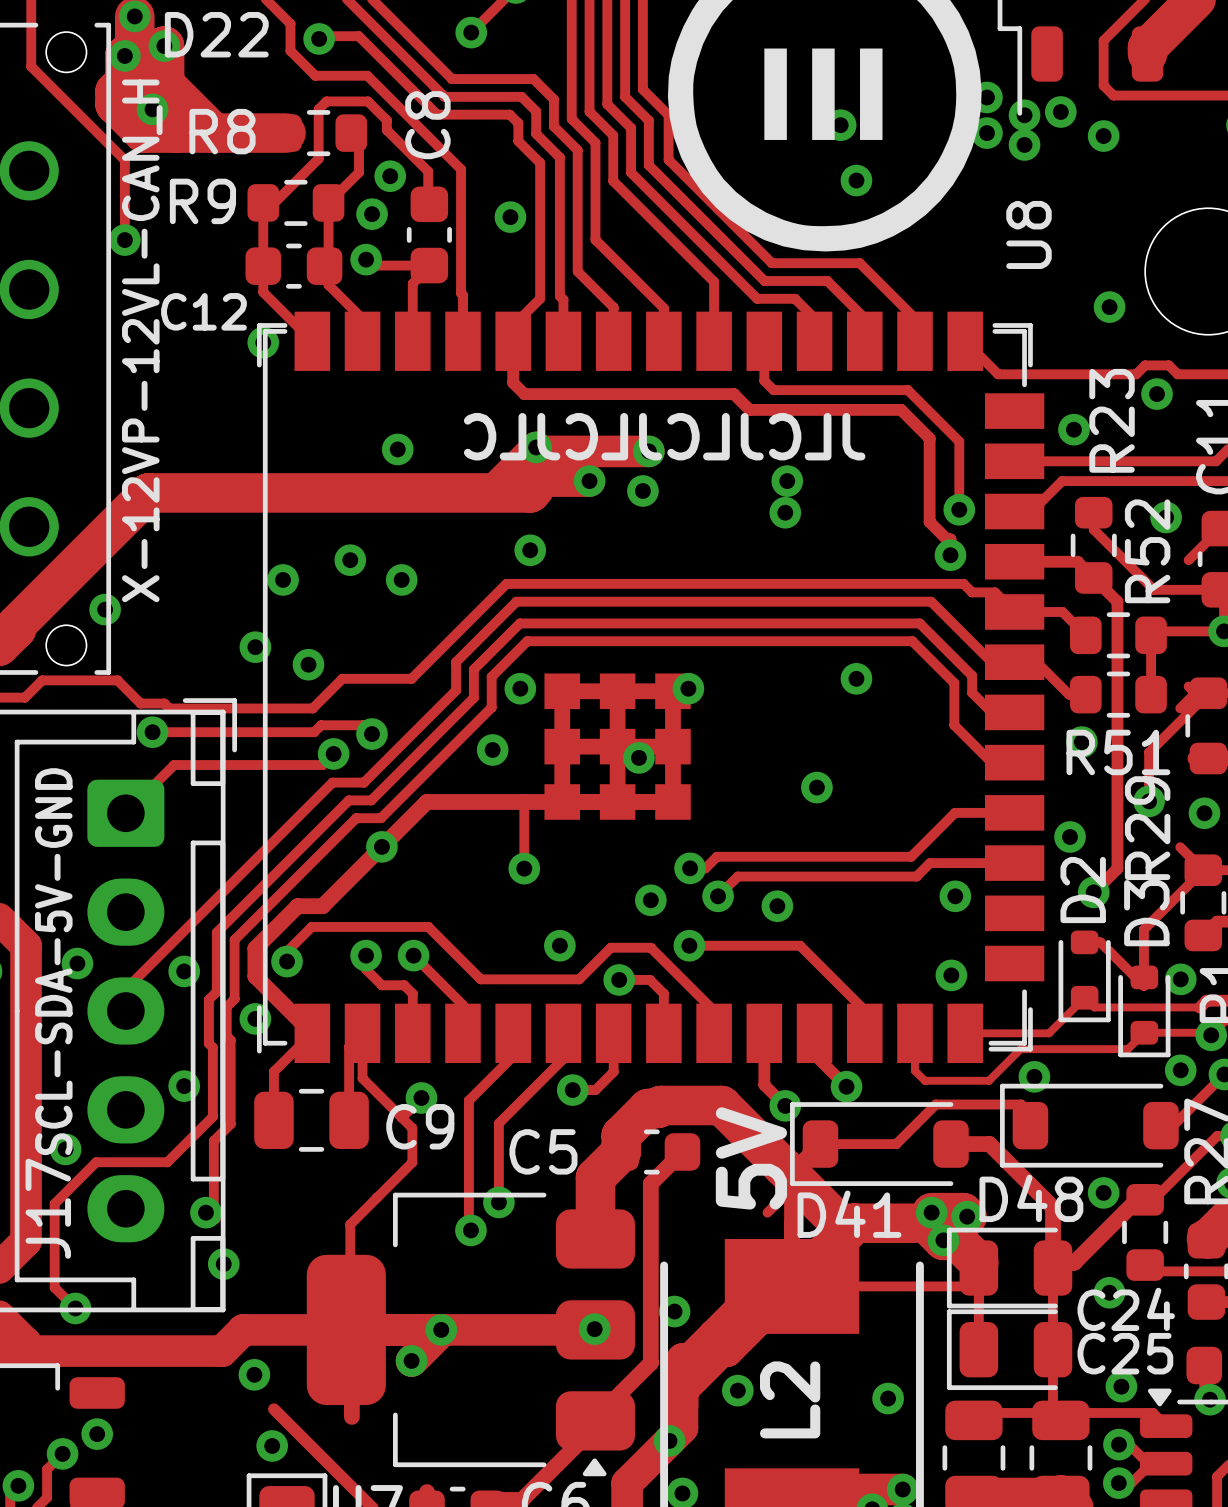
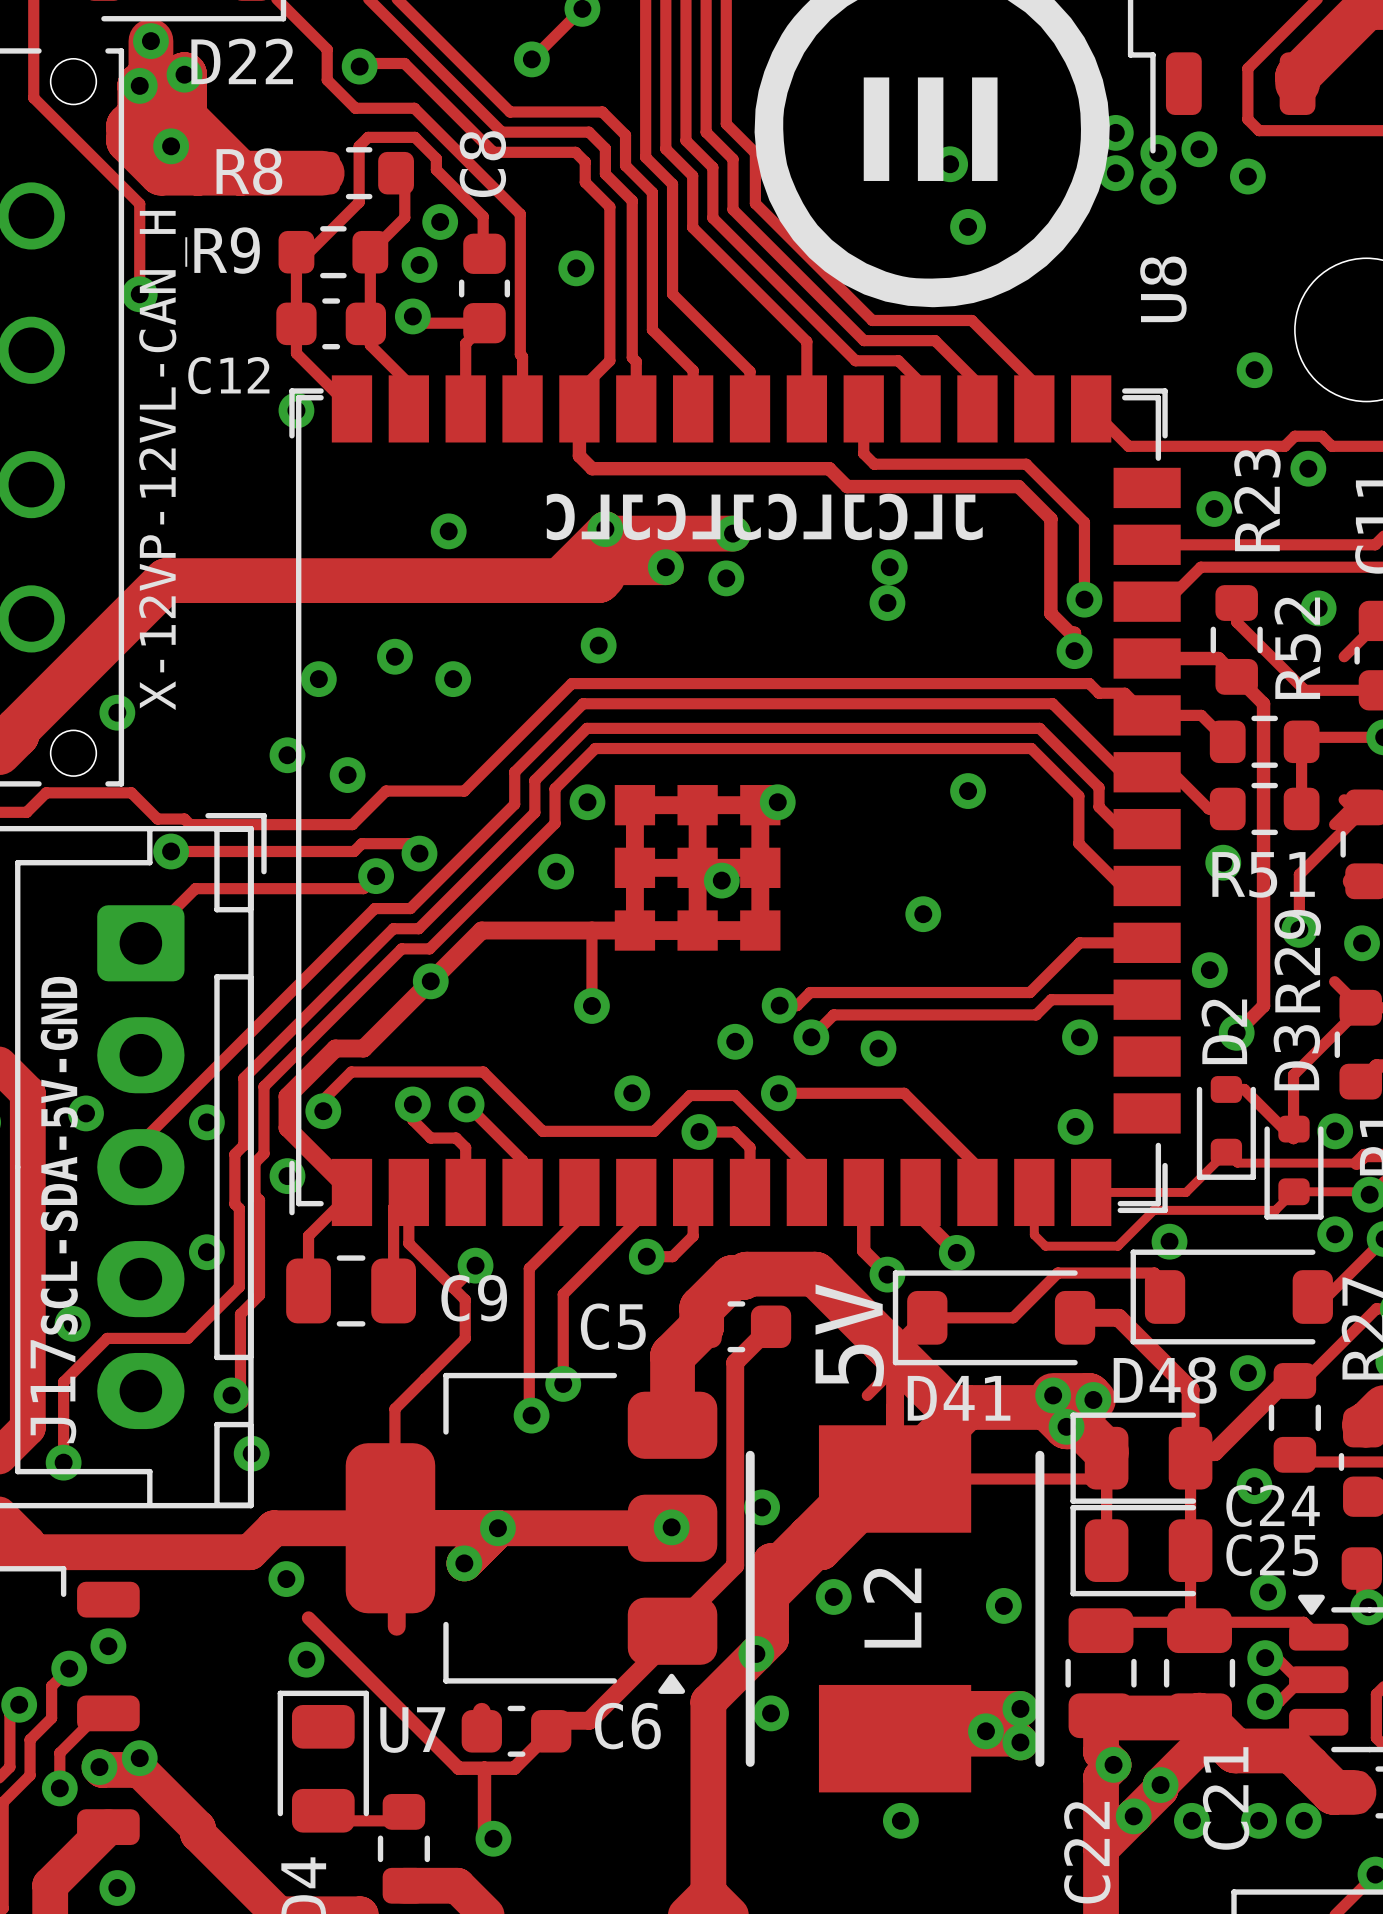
track: (57, 1200) (54, 1203) (54, 1287) (75, 1308) -> (63, 1382) (63, 1462)
via position: (75, 1308) -> (63, 1462)

